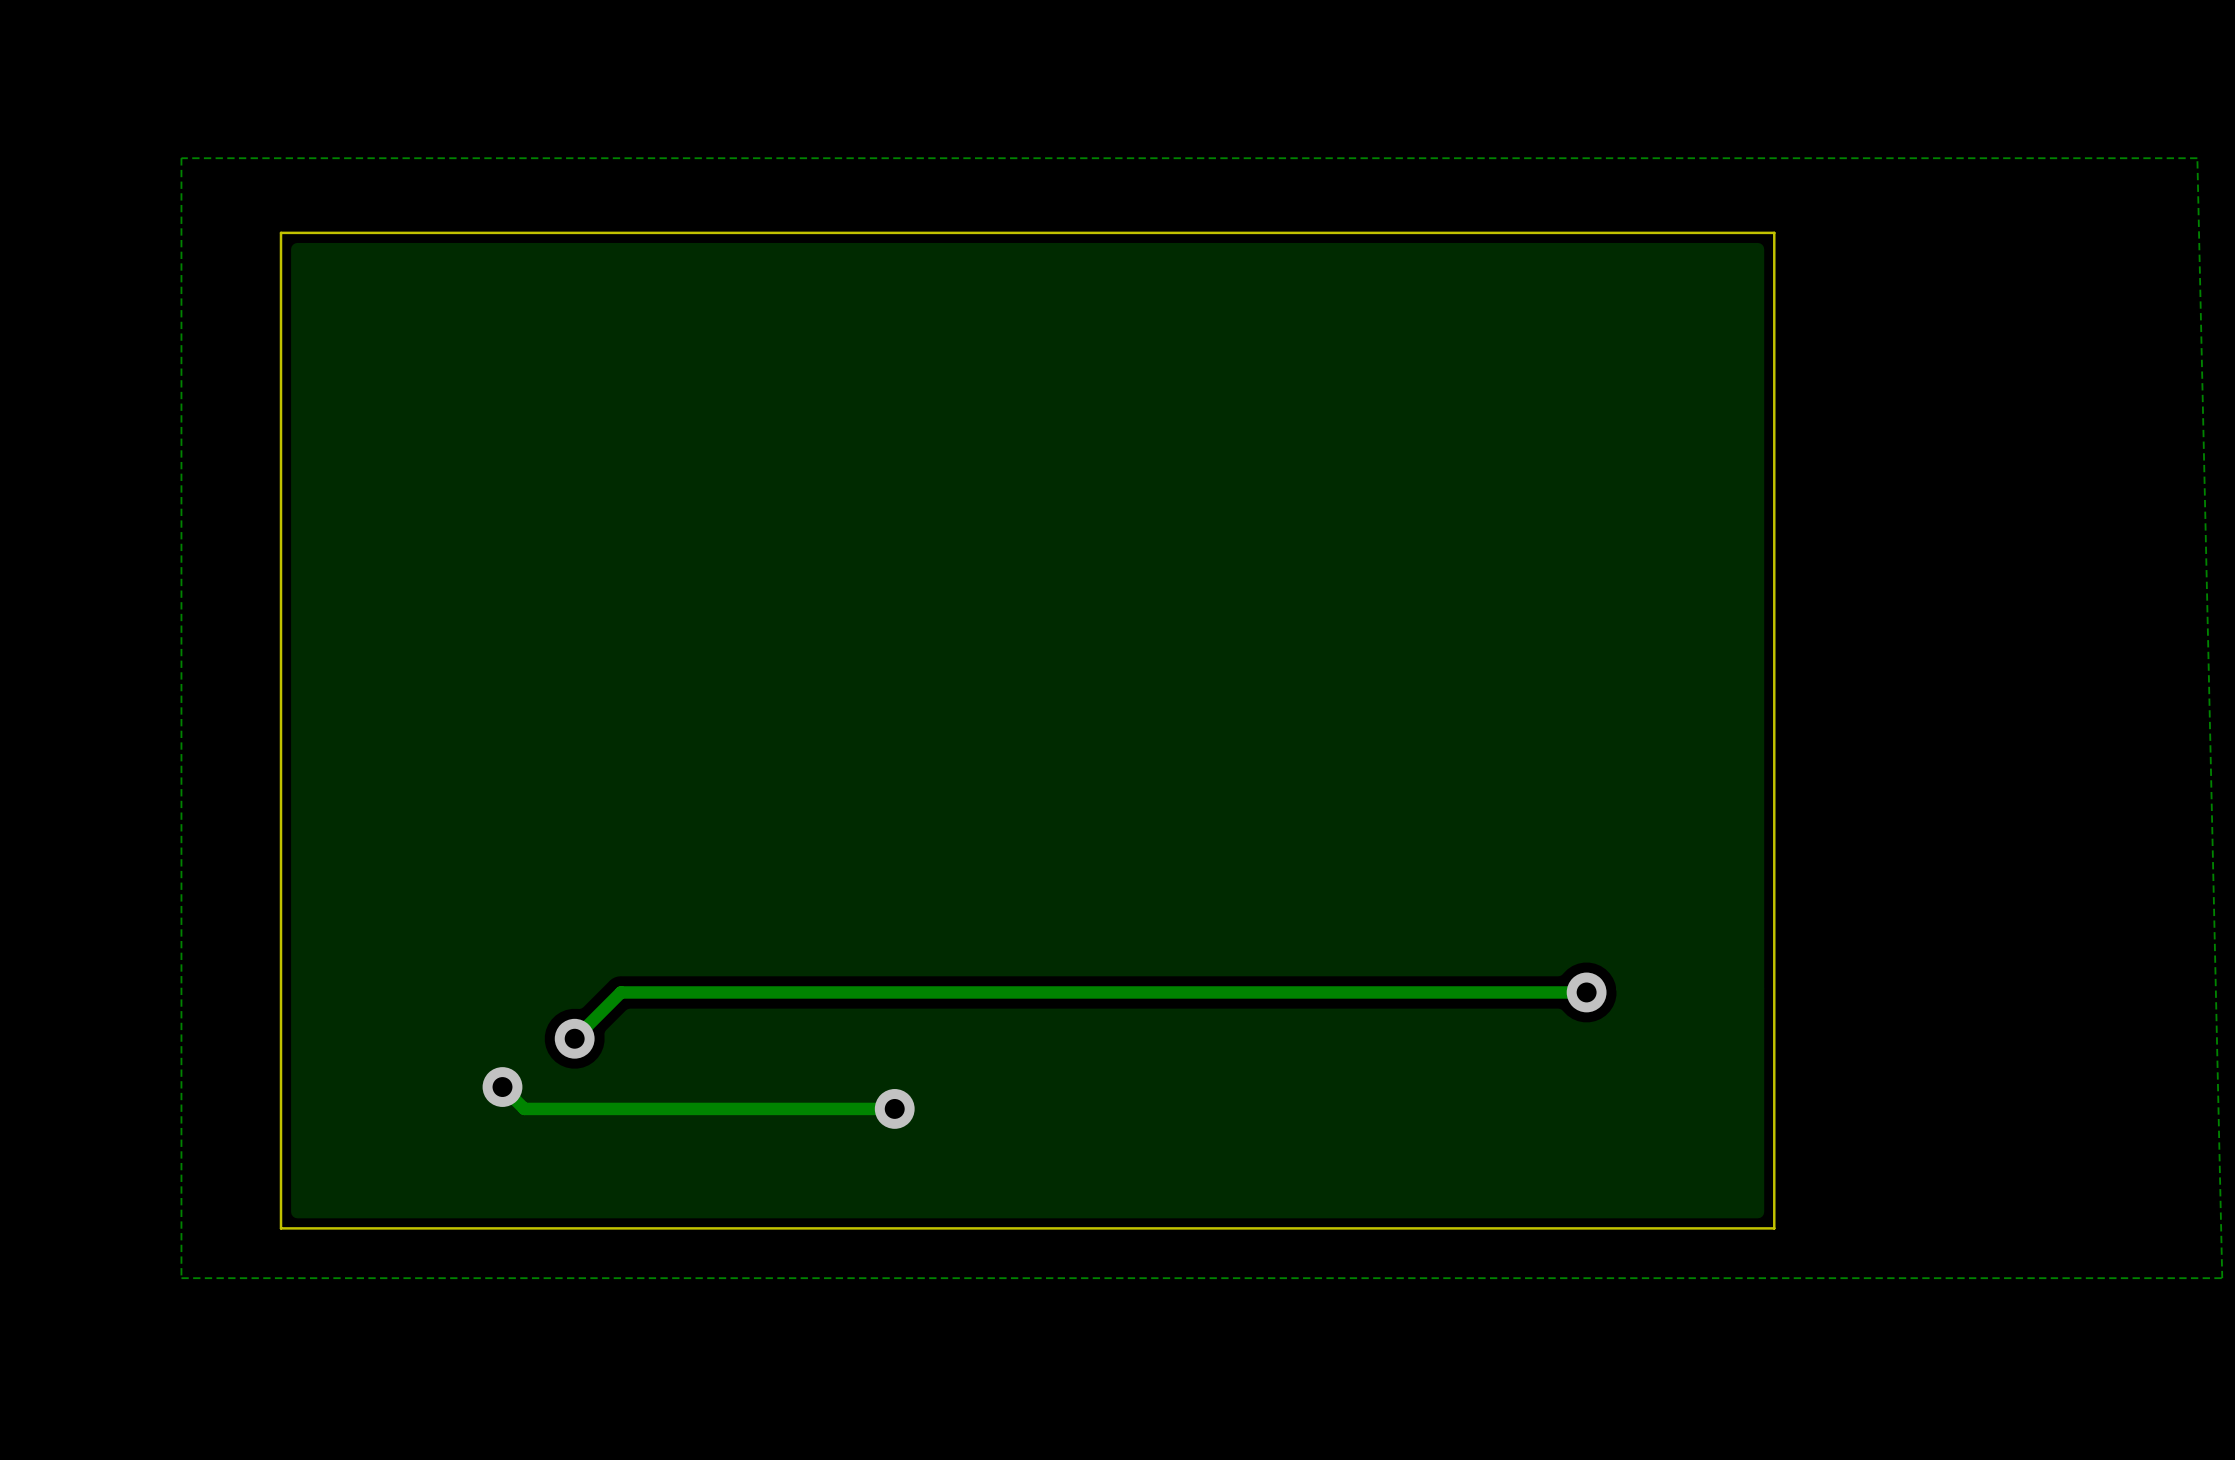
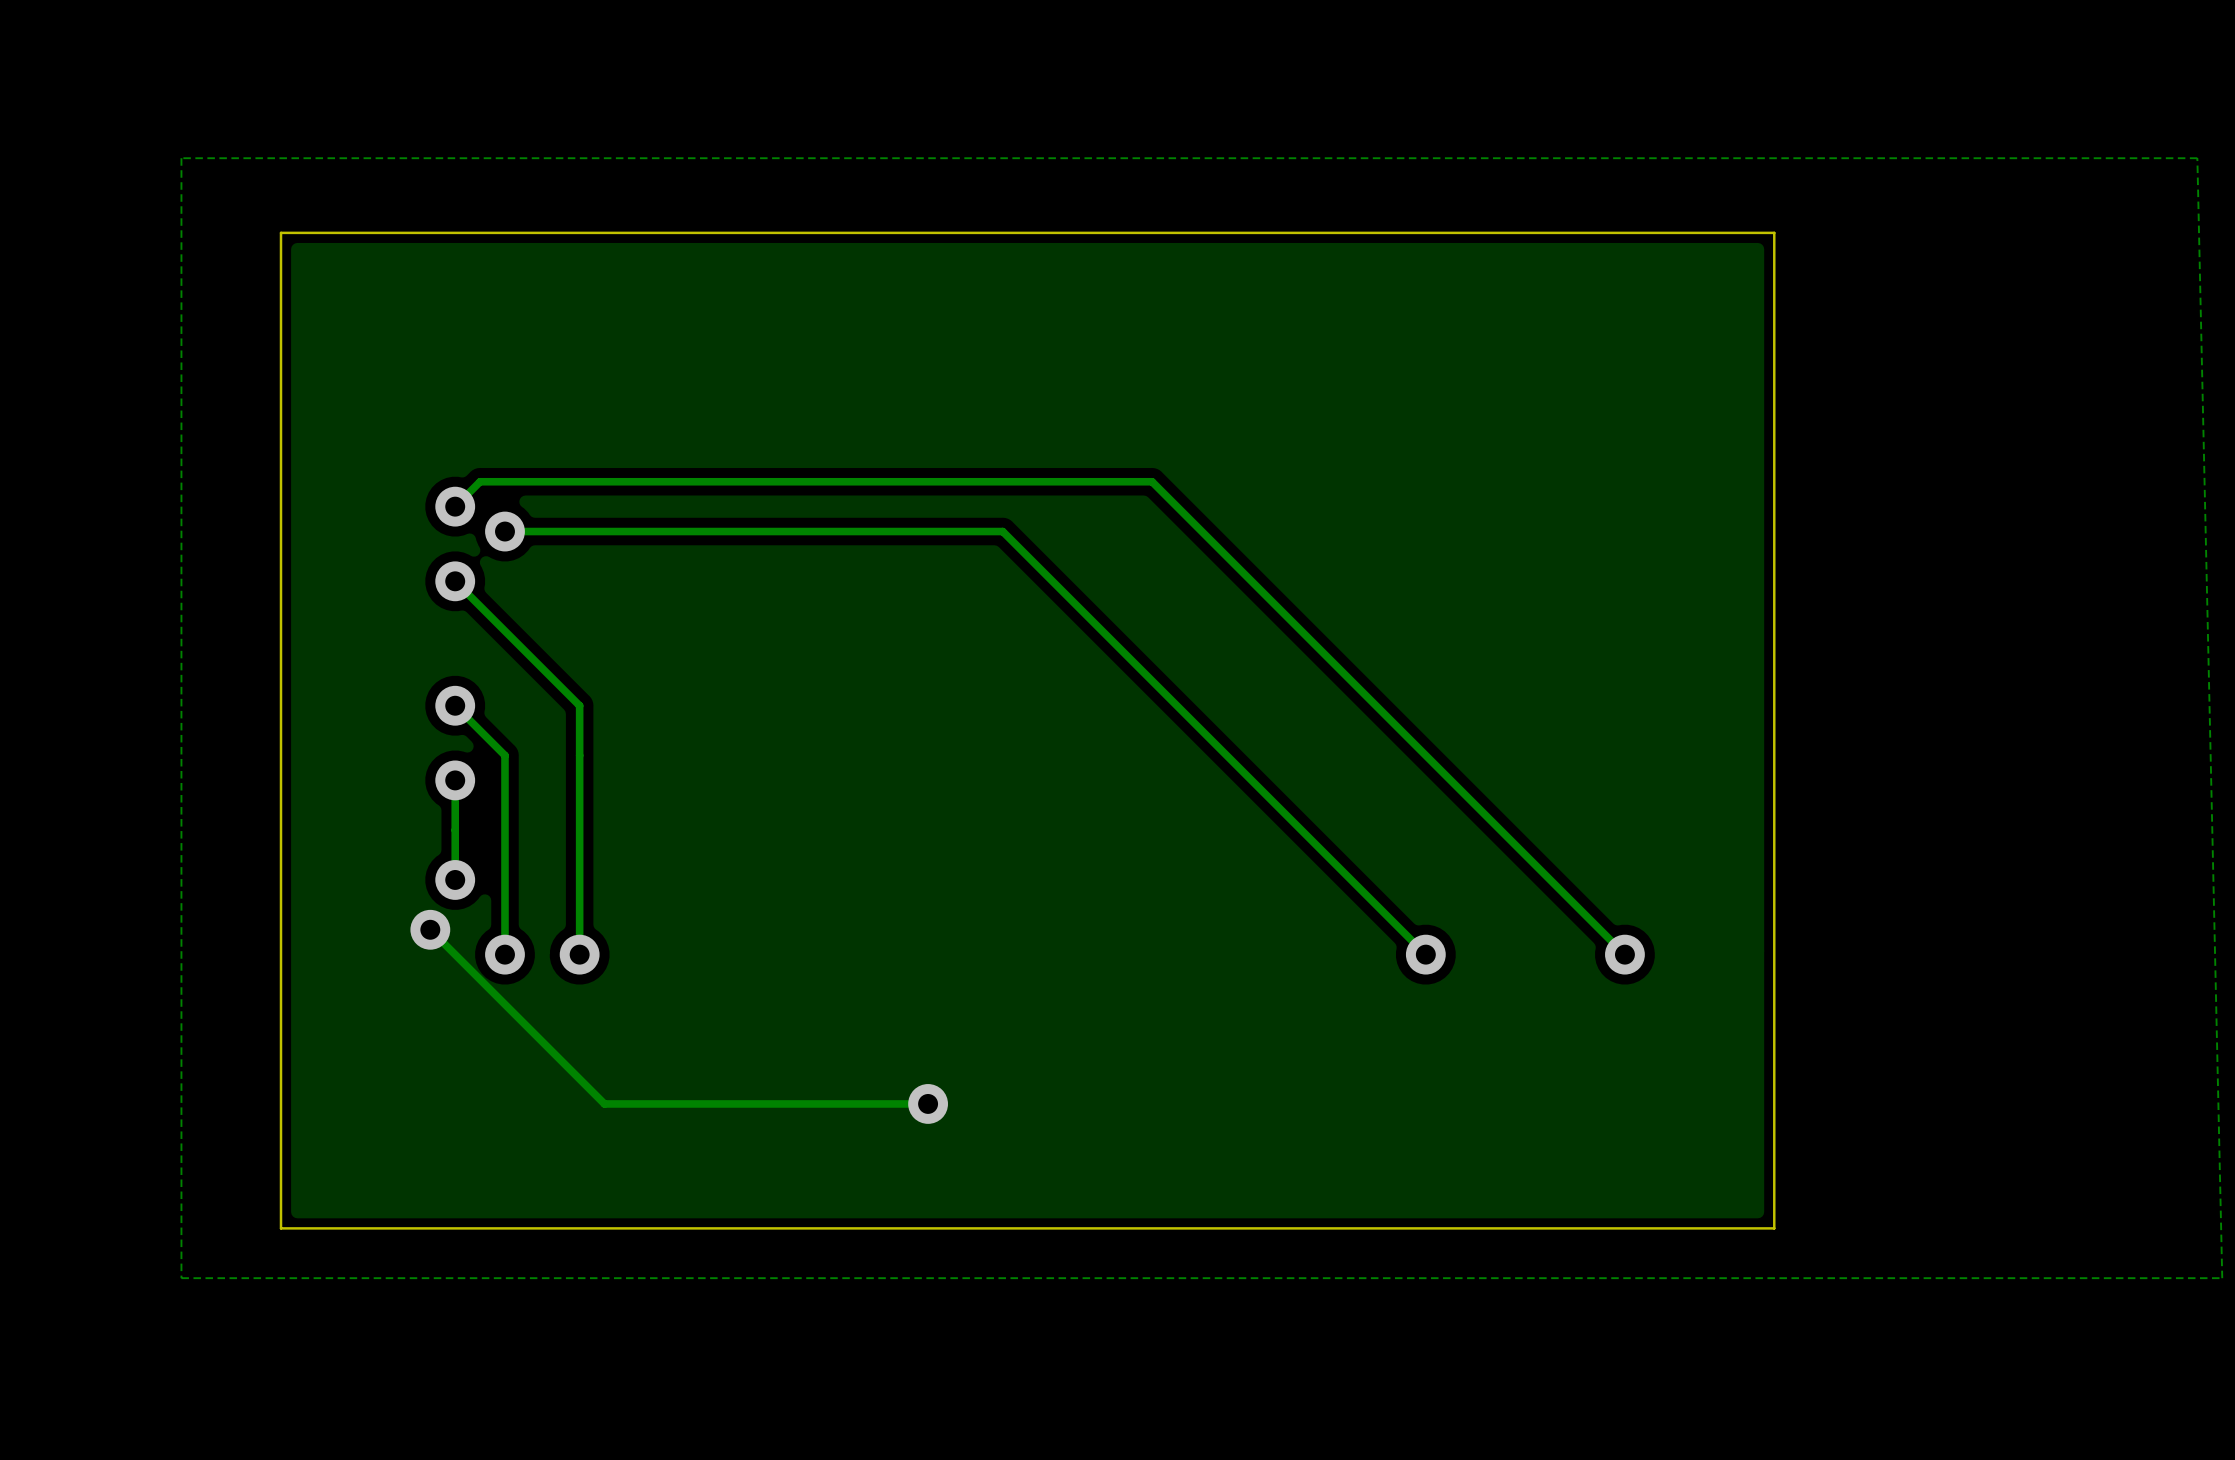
track: none -> (455, 506) (480, 481) (1152, 481) (1624, 954)
via: none -> (455, 506)
track: none -> (504, 531) (1002, 531) (1425, 954)
via: none -> (504, 531)
track: none -> (455, 581) (579, 705) (579, 954)
via: none -> (455, 581)
track: none -> (455, 705) (504, 755) (504, 954)
via: none -> (455, 705)
track: none -> (455, 780) (455, 879)
via: none -> (455, 780)
via: none -> (455, 879)
track: none -> (430, 929) (604, 1103) (928, 1103)
via: none -> (430, 929)
via: none -> (504, 954)
via: none -> (579, 954)
via: none -> (1425, 954)
track: (1586, 992) (620, 992) (574, 1038) -> none
via position: (1586, 992) -> (1624, 954)
via: (574, 1038) -> none
track: (502, 1087) (524, 1108) (894, 1108) -> none
via: (502, 1087) -> none
via position: (894, 1108) -> (928, 1103)

